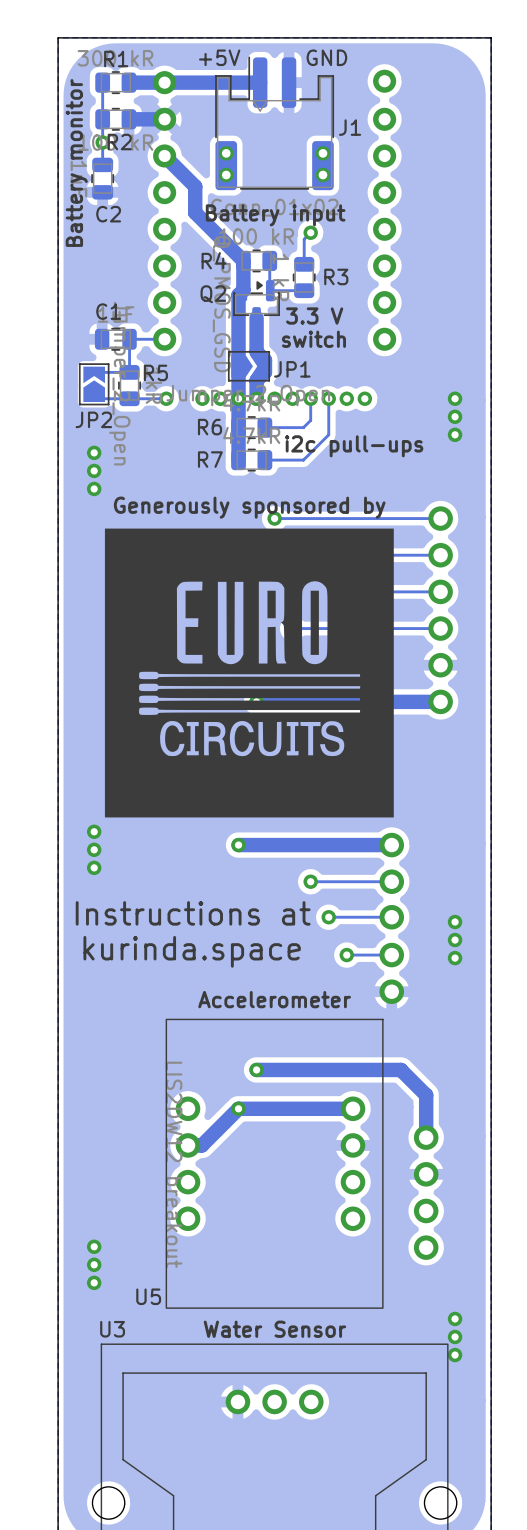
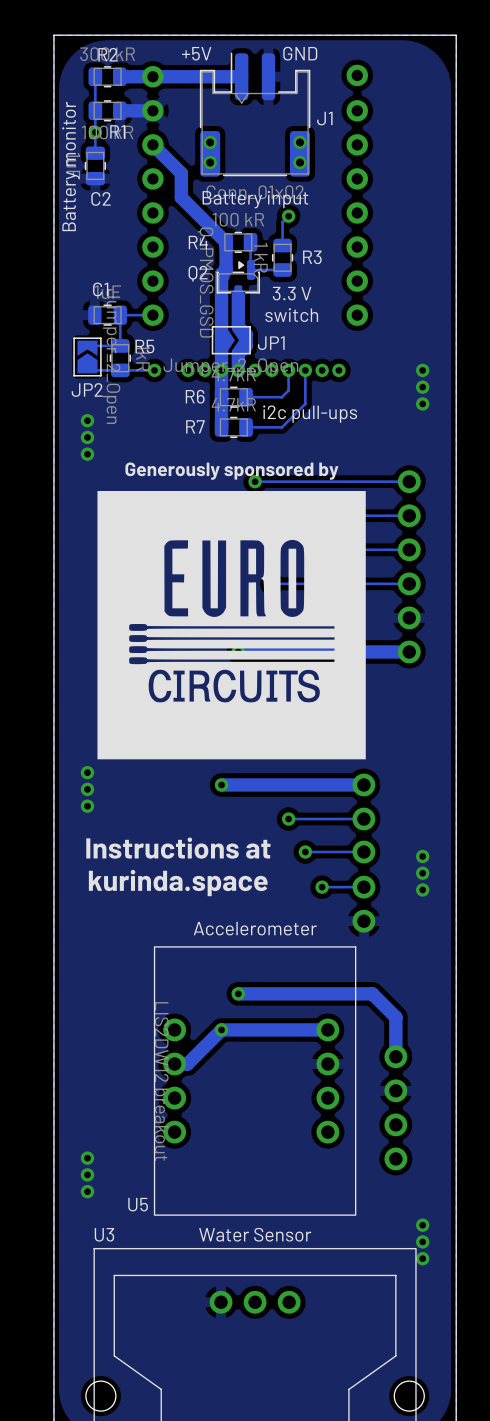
R1 name position: R1 (116, 59) -> R1 (117, 131)
R2 name position: R2 (119, 142) -> R2 (107, 54)

